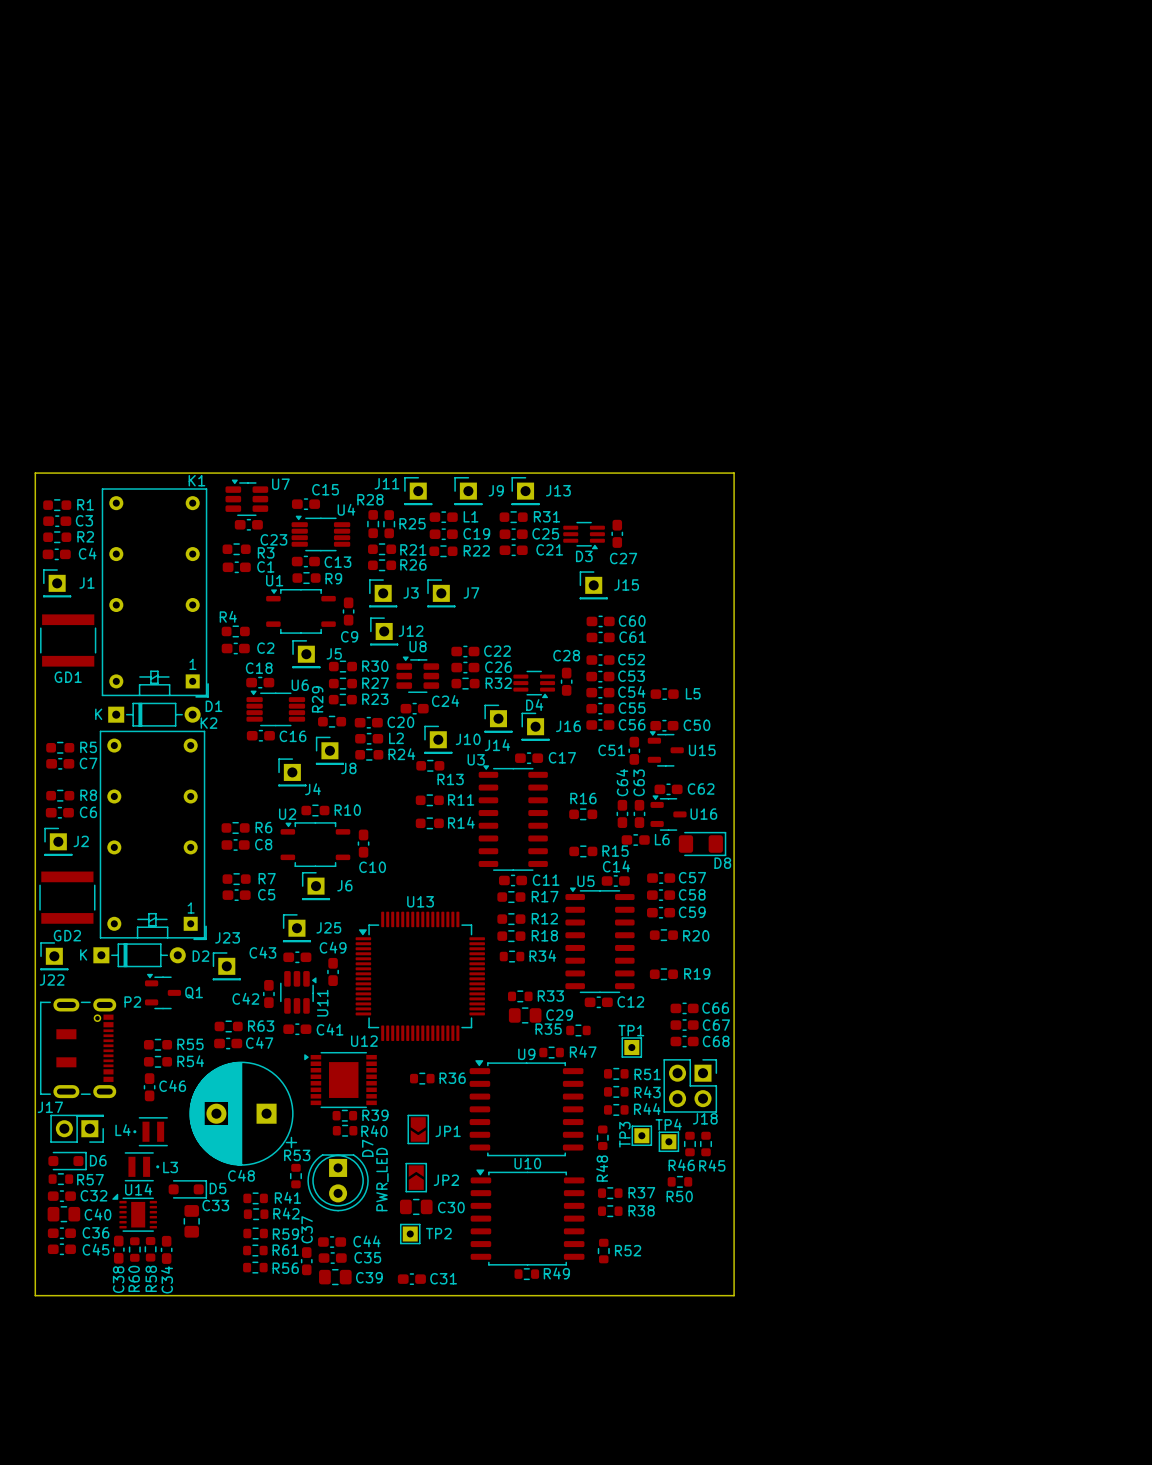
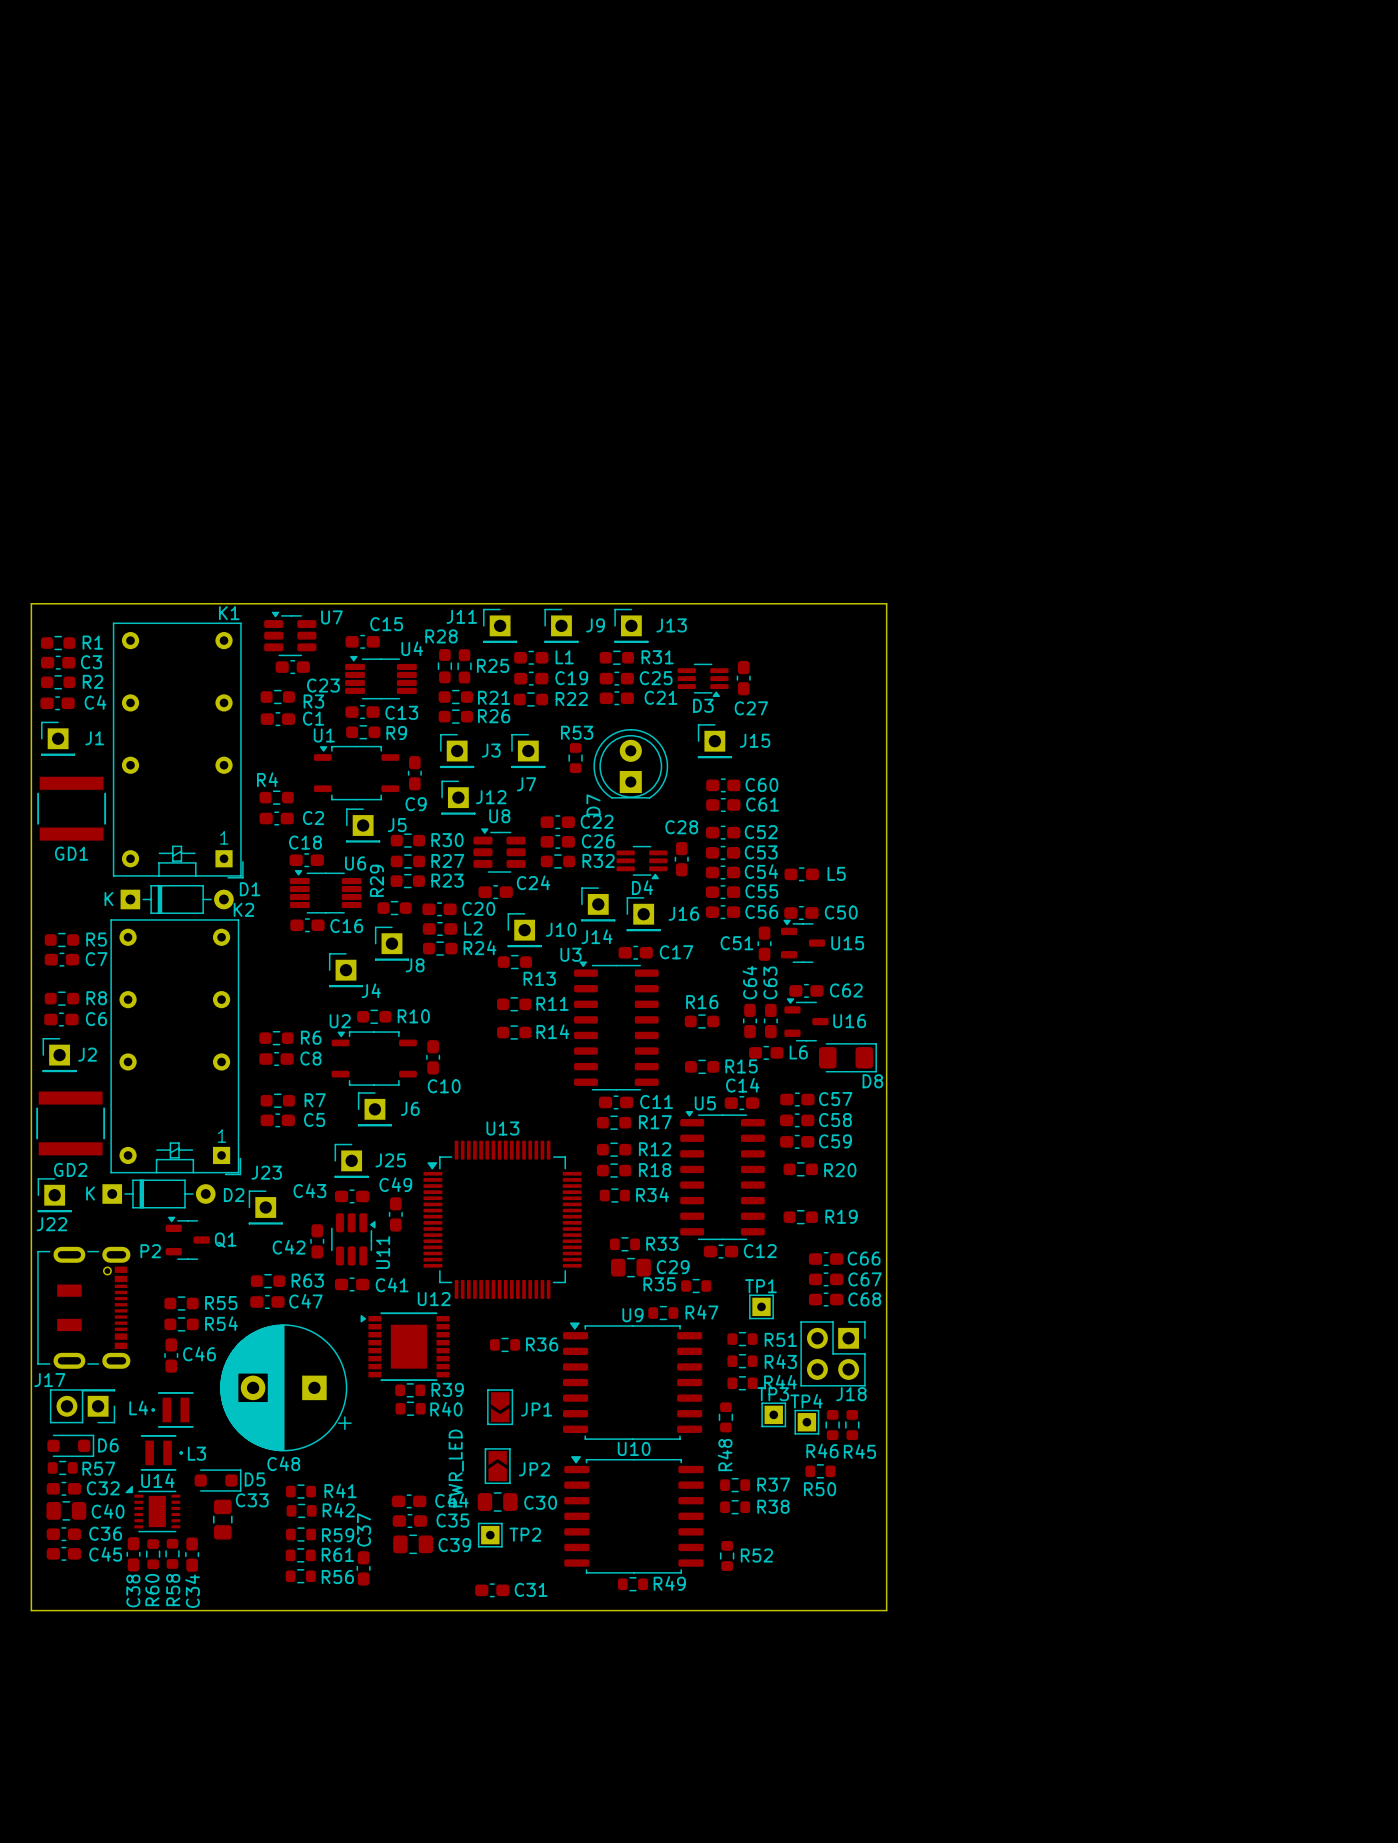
J7 name position: J7 (471, 592) -> J7 (526, 784)
TP3 name rotation: 0° (624, 1134) -> 90° clockwise (773, 1394)
R53 position: (295, 1176) -> (575, 758)
D7 rotation: 0° (338, 1182) -> 180° (630, 763)
D7 position: (338, 1182) -> (630, 763)
C44 position: (332, 1242) -> (409, 1501)
C35 position: (332, 1258) -> (409, 1521)
C39 position: (335, 1277) -> (413, 1544)

